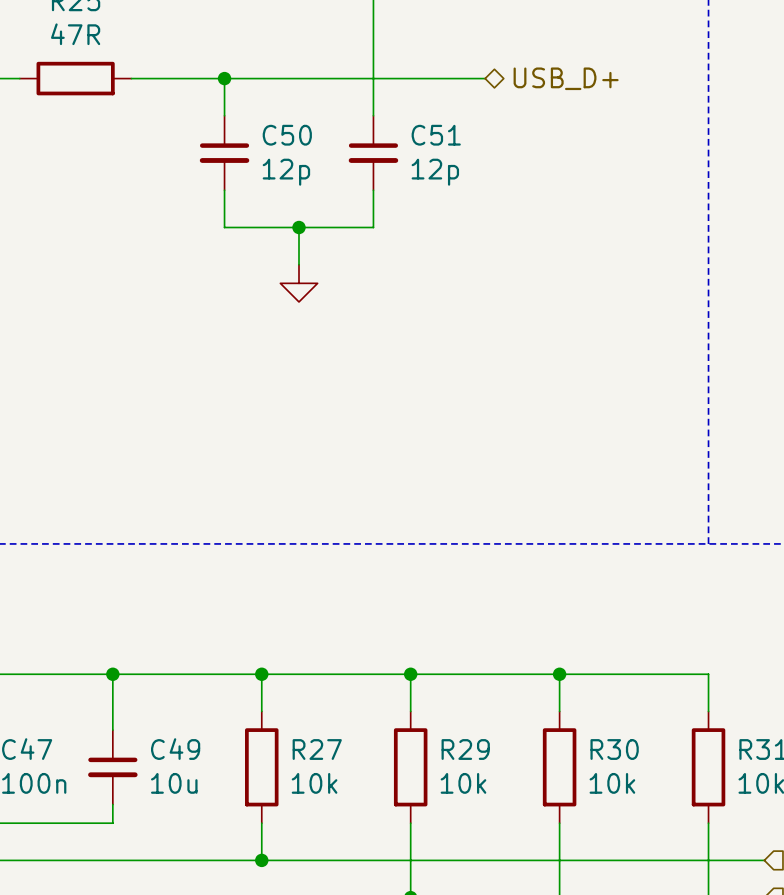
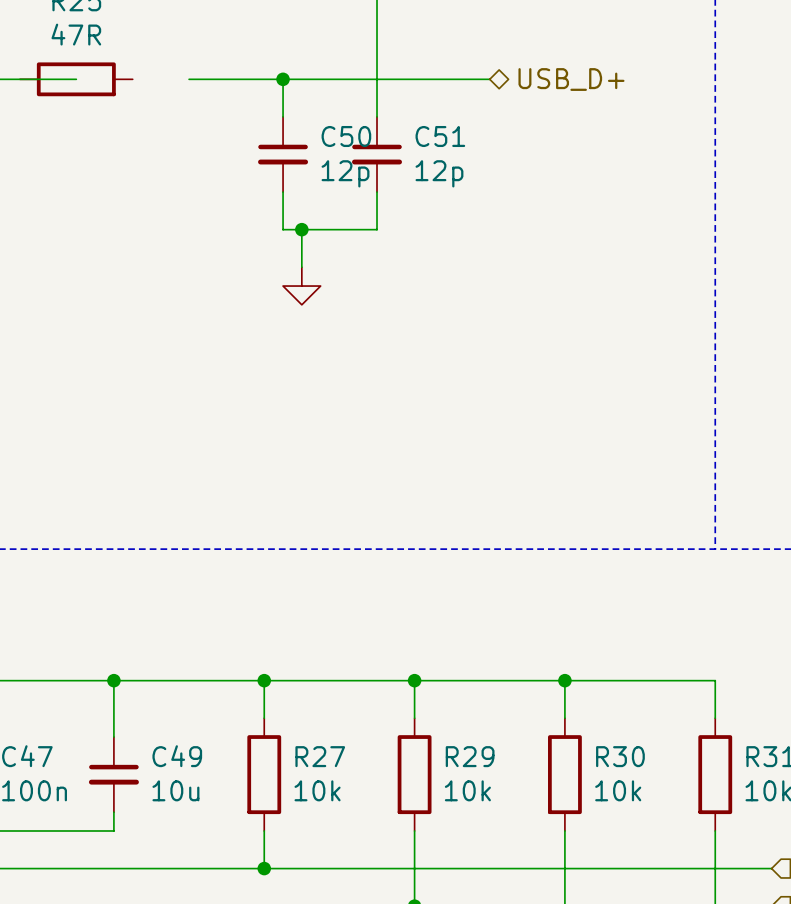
wire: (131, 78) (187, 78) -> (19, 79) (76, 79)
wire: (224, 78) (224, 115) -> (283, 79) (283, 116)
junction position: (224, 78) -> (283, 79)
C50 position: (224, 153) -> (283, 154)
wire: (224, 190) (224, 227) (280, 227) -> (283, 192) (283, 229)

